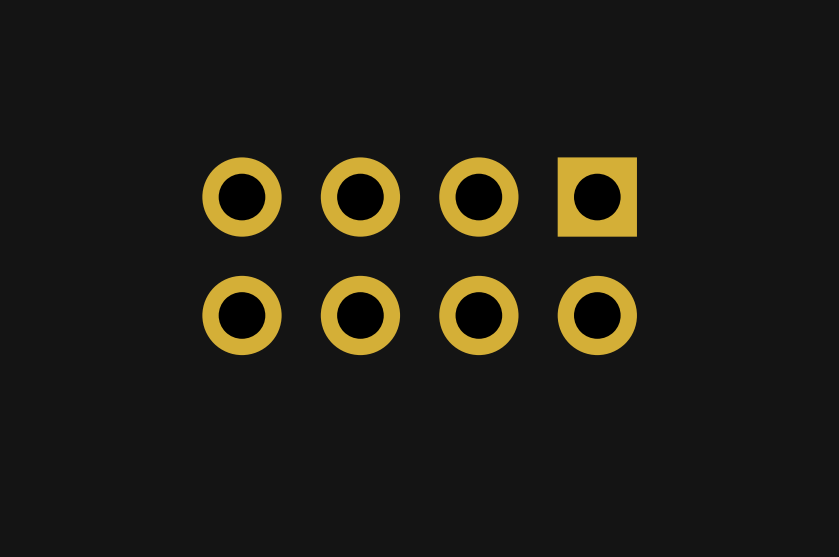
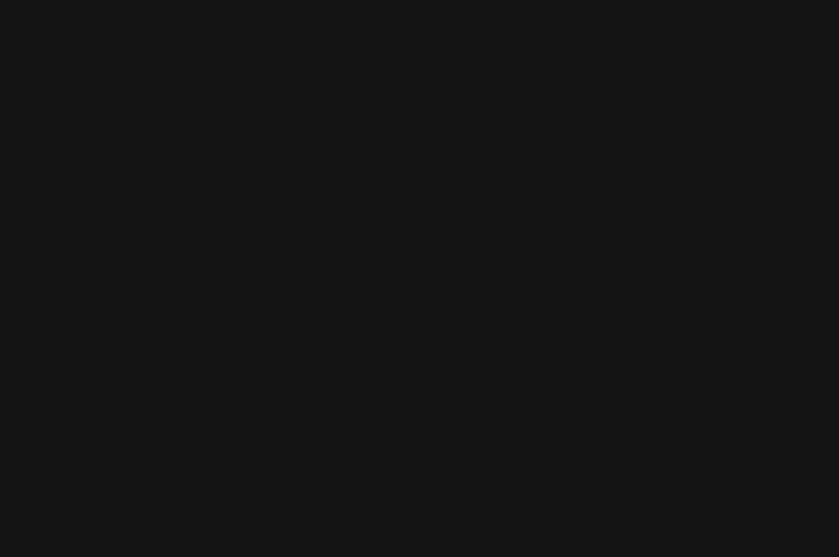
part: (419, 256) -> none

